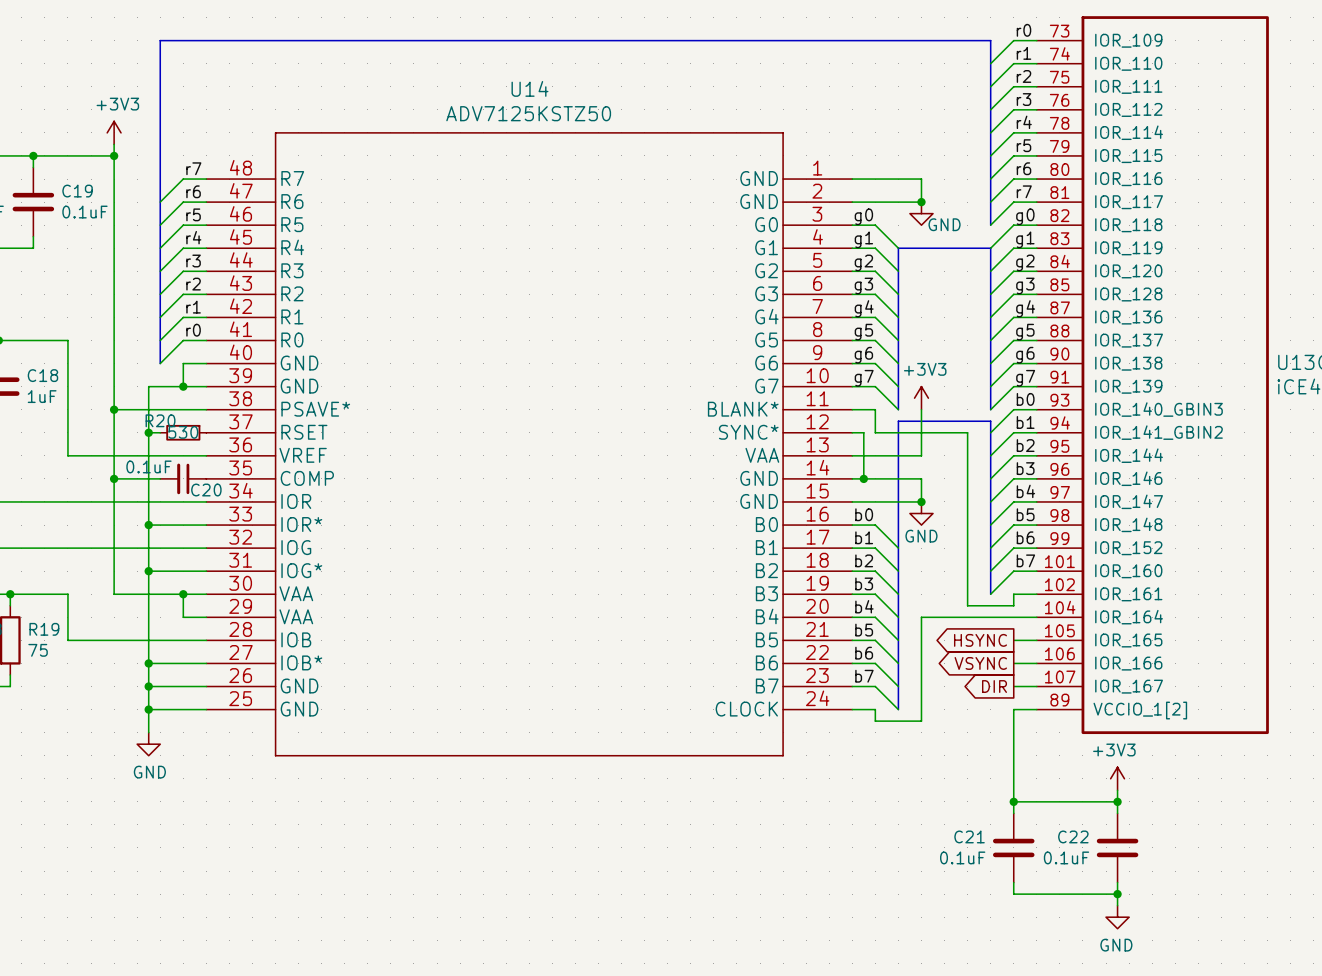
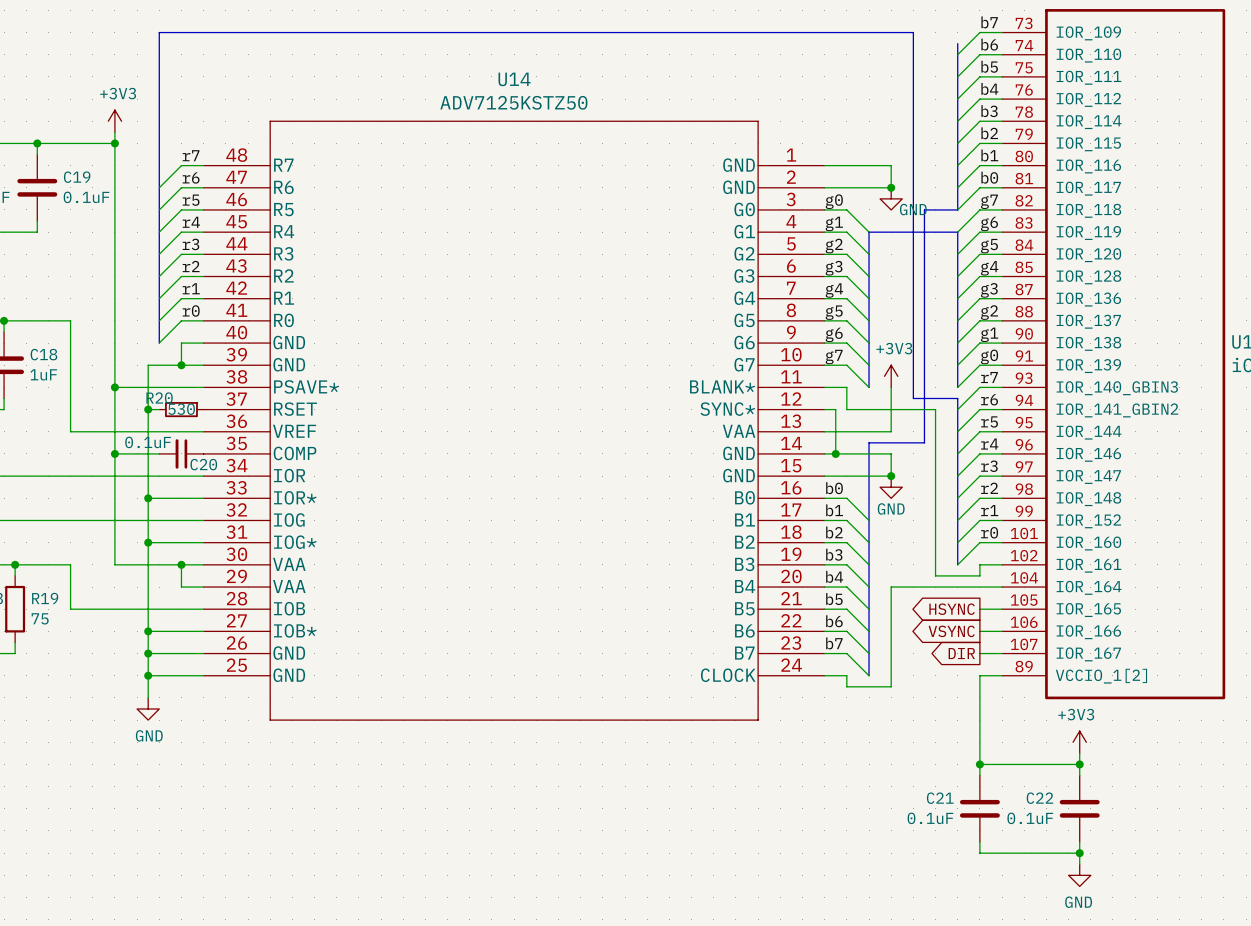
label: r0 (1023, 30) -> b7 (989, 22)
bus: (944, 40) (990, 40) (990, 52) -> (913, 32) (913, 398)
label: r1 (1023, 53) -> b6 (989, 44)
label: r2 (1023, 76) -> b5 (989, 66)
label: r3 (1023, 99) -> b4 (989, 88)
label: r4 (1024, 122) -> b3 (989, 111)
label: r5 (1023, 145) -> b2 (989, 133)
label: r6 (1023, 168) -> b1 (989, 155)
label: r7 (1024, 191) -> b0 (989, 177)
label: g0 (1025, 216) -> g7 (989, 201)
label: g1 (1025, 239) -> g6 (989, 223)
label: g2 (1025, 262) -> g5 (989, 246)
label: g3 (1025, 286) -> g4 (989, 268)
label: g4 (1025, 308) -> g3 (989, 290)
label: g5 (1025, 332) -> g2 (989, 312)
label: g6 (1025, 355) -> g1 (989, 334)
label: g7 (1025, 378) -> g0 (989, 356)
label: b0 (1025, 399) -> r7 (989, 377)
bus: (944, 421) (898, 421) (898, 467) -> (957, 209) (924, 209) (924, 442) (869, 442)
label: b1 (1025, 422) -> r6 (989, 399)
label: b2 (1025, 445) -> r5 (989, 421)
label: b3 (1025, 468) -> r4 (989, 444)
label: b4 (1025, 491) -> r3 (989, 466)
label: b5 (1025, 514) -> r2 (989, 488)
label: b6 (1025, 537) -> r1 (989, 510)
label: b7 (1025, 560) -> r0 (989, 532)

